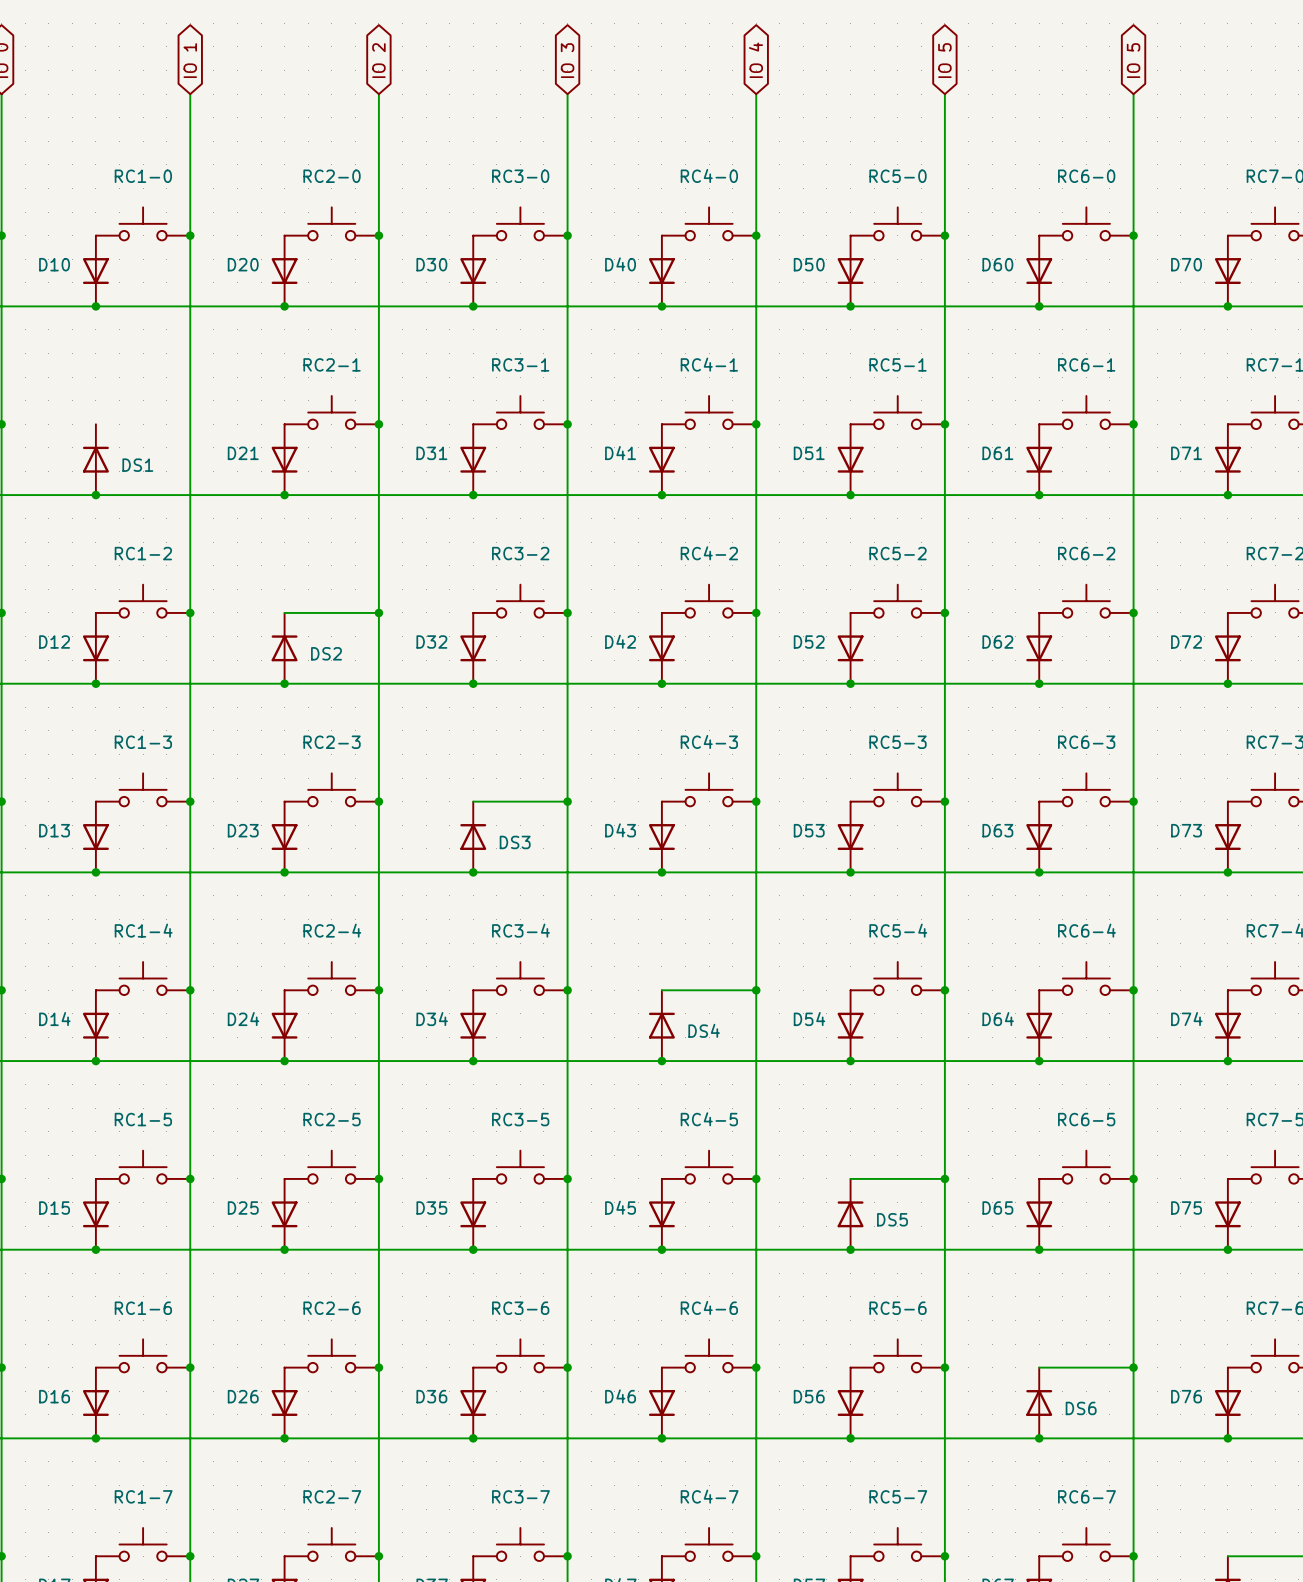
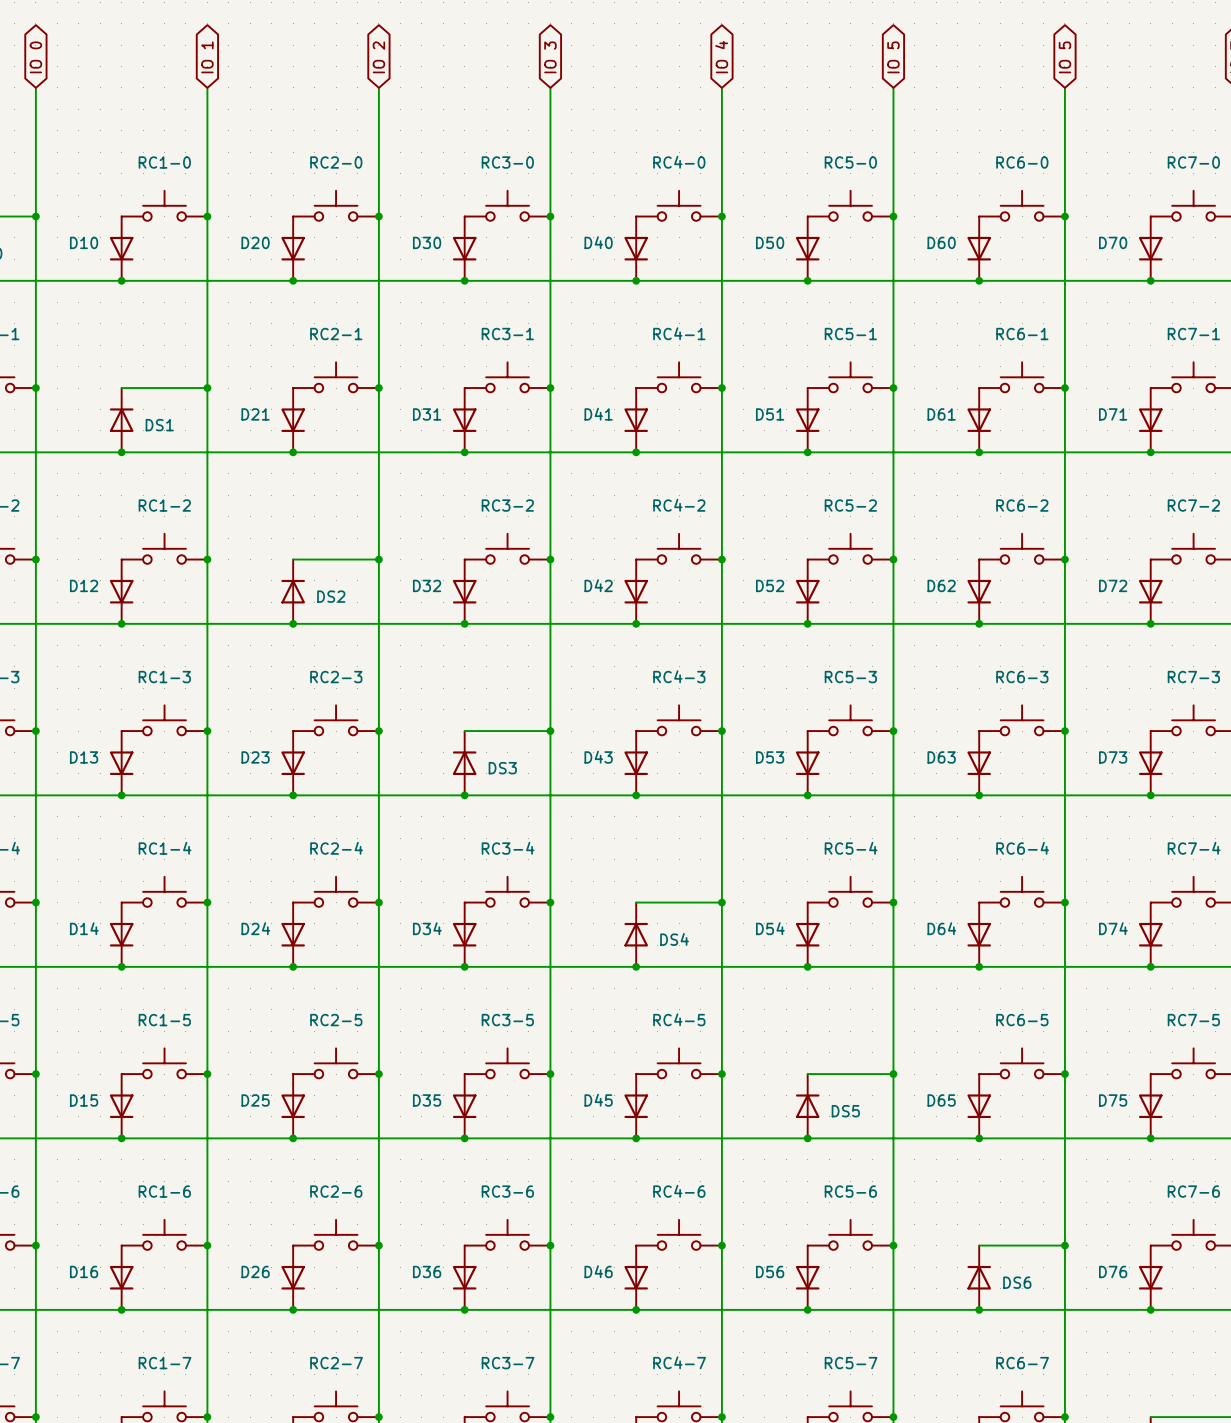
wire: none -> (121, 388) (207, 388)
junction: none -> (207, 388)

